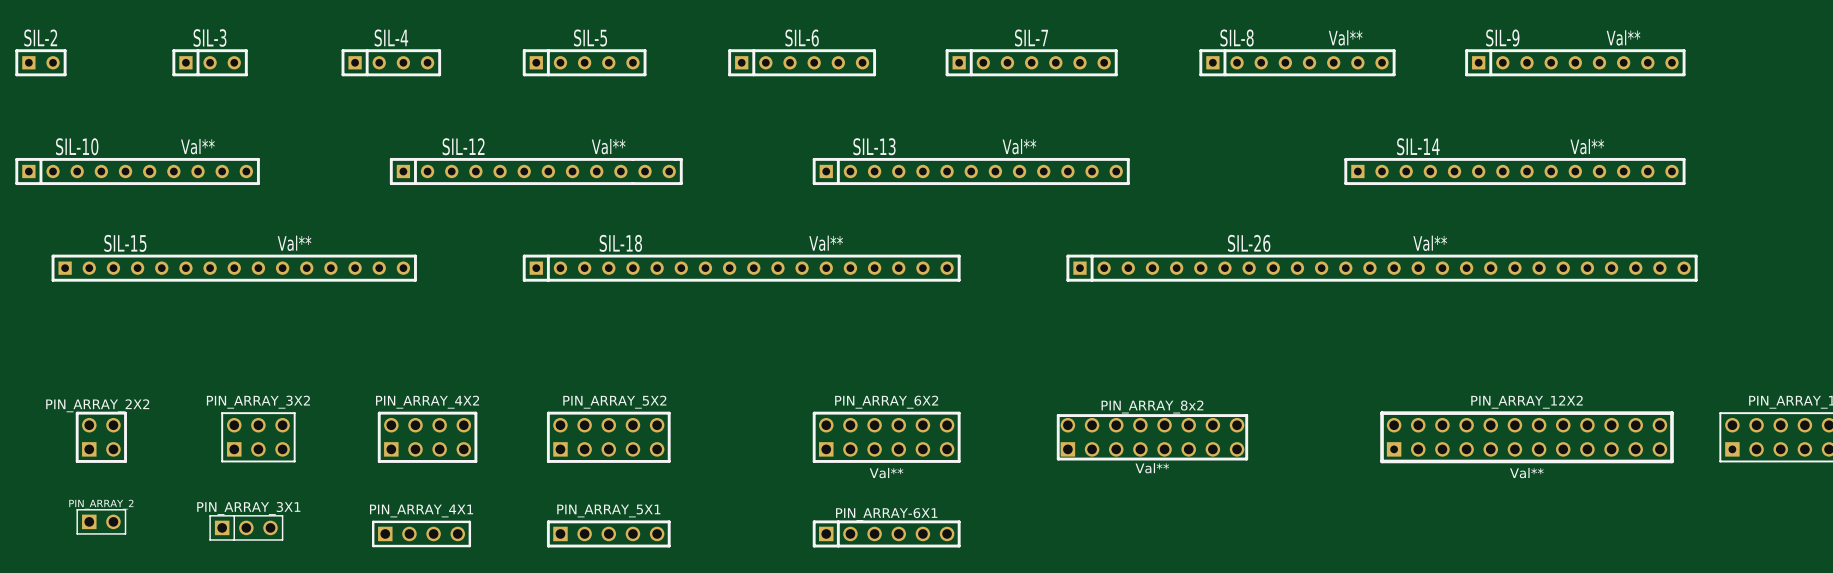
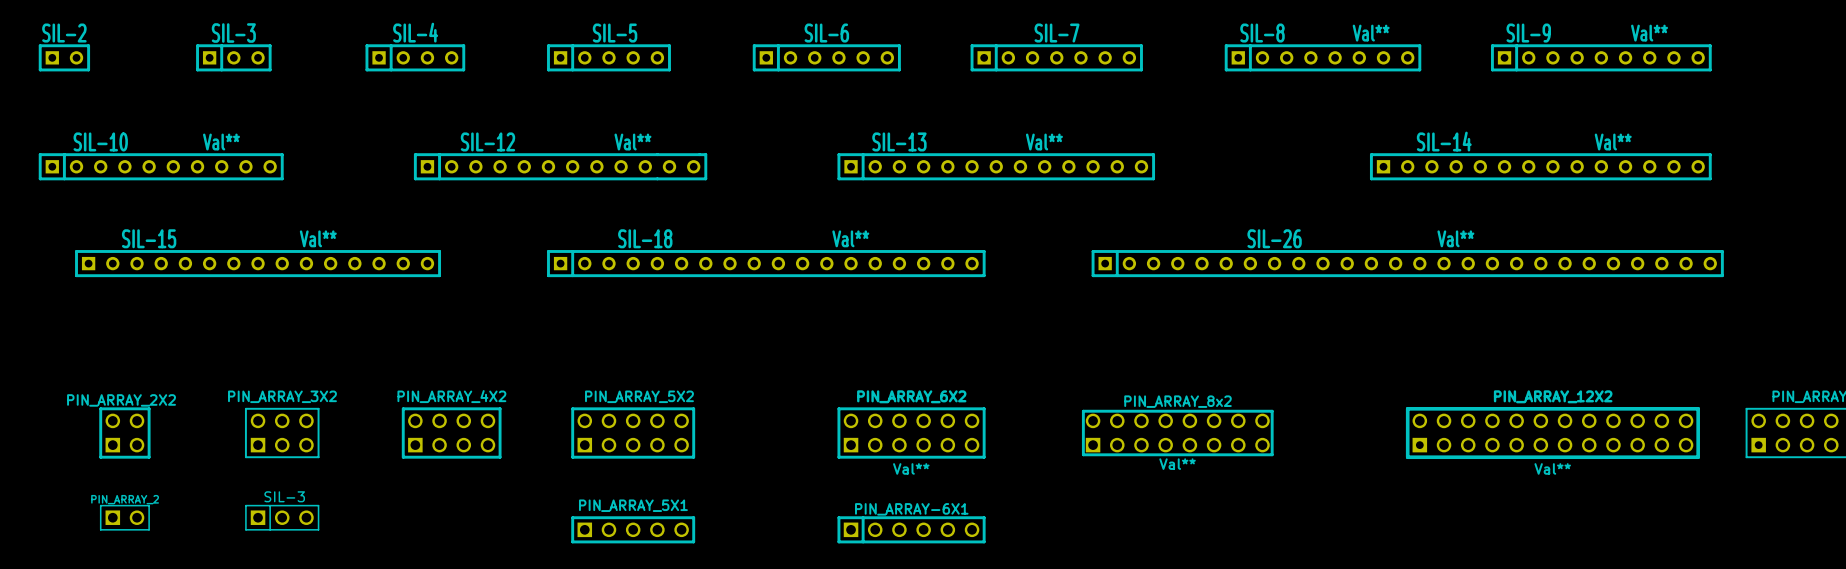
SIL-3: none -> (282, 517)
PIN_ARRAY_3X1: (246, 527) -> none
PIN_ARRAY_4X1: (421, 533) -> none

